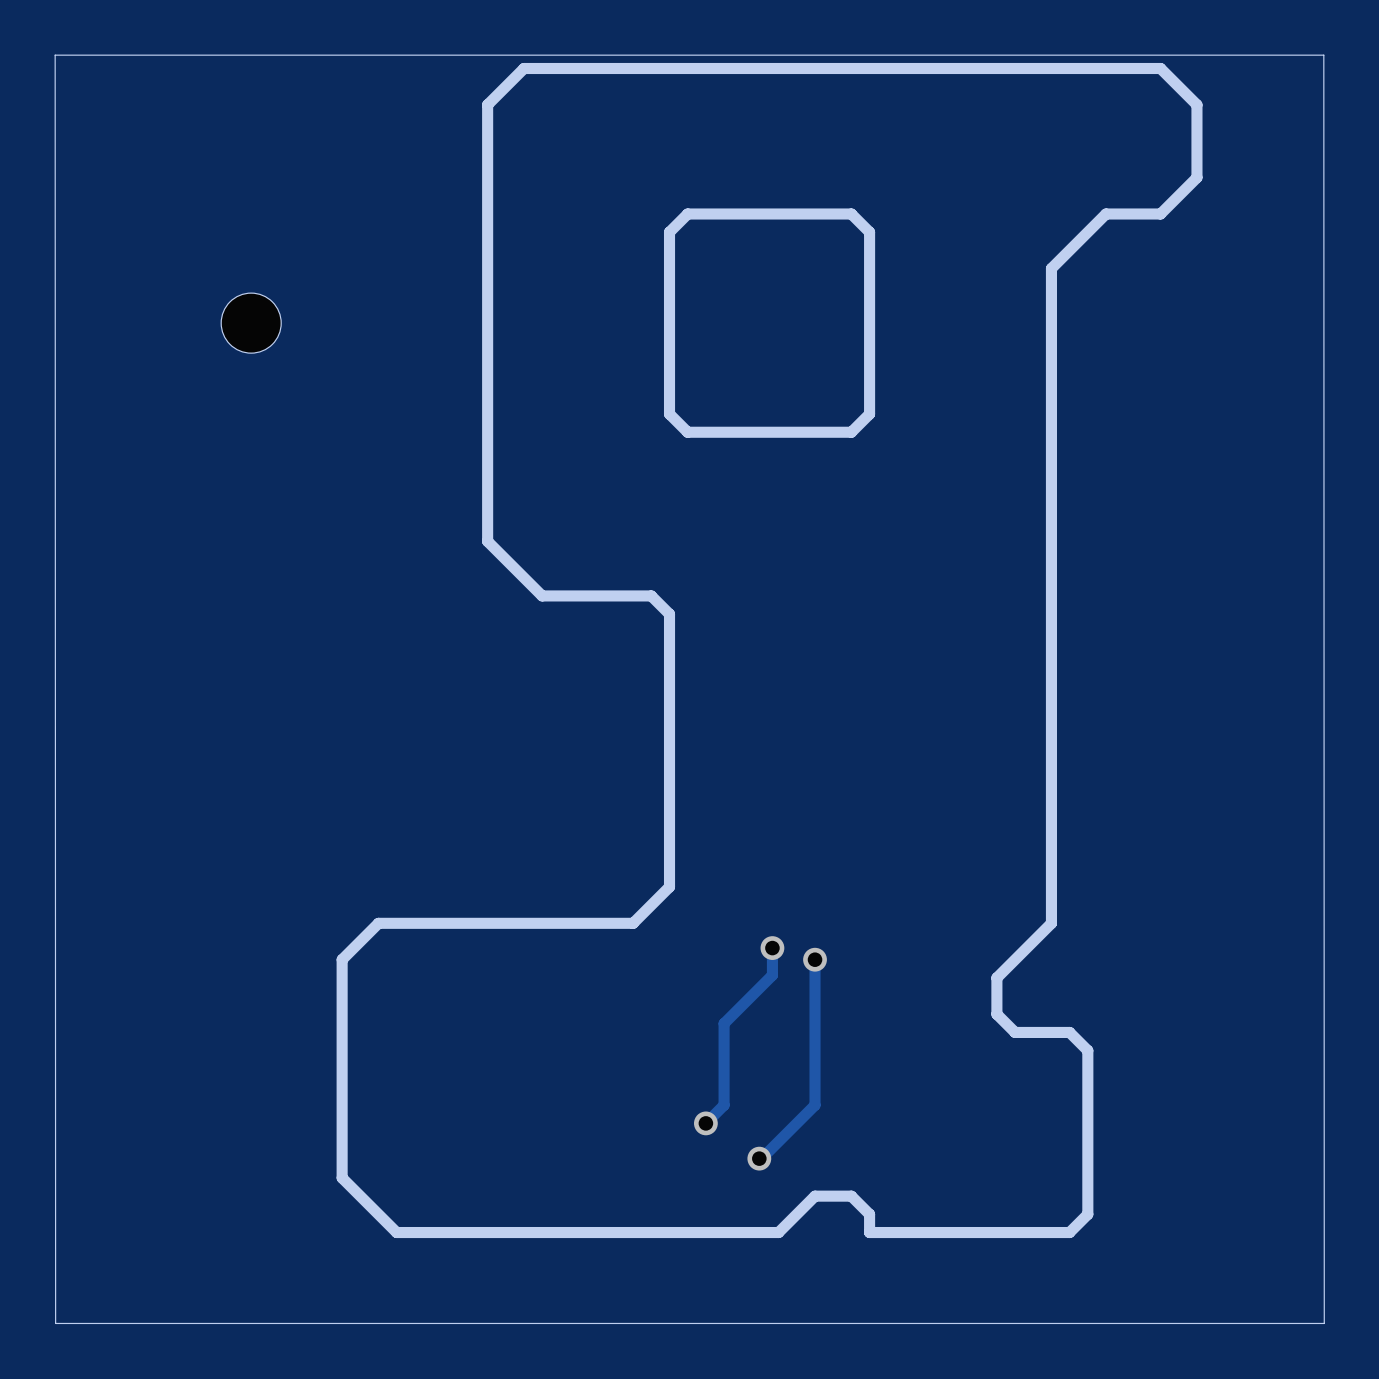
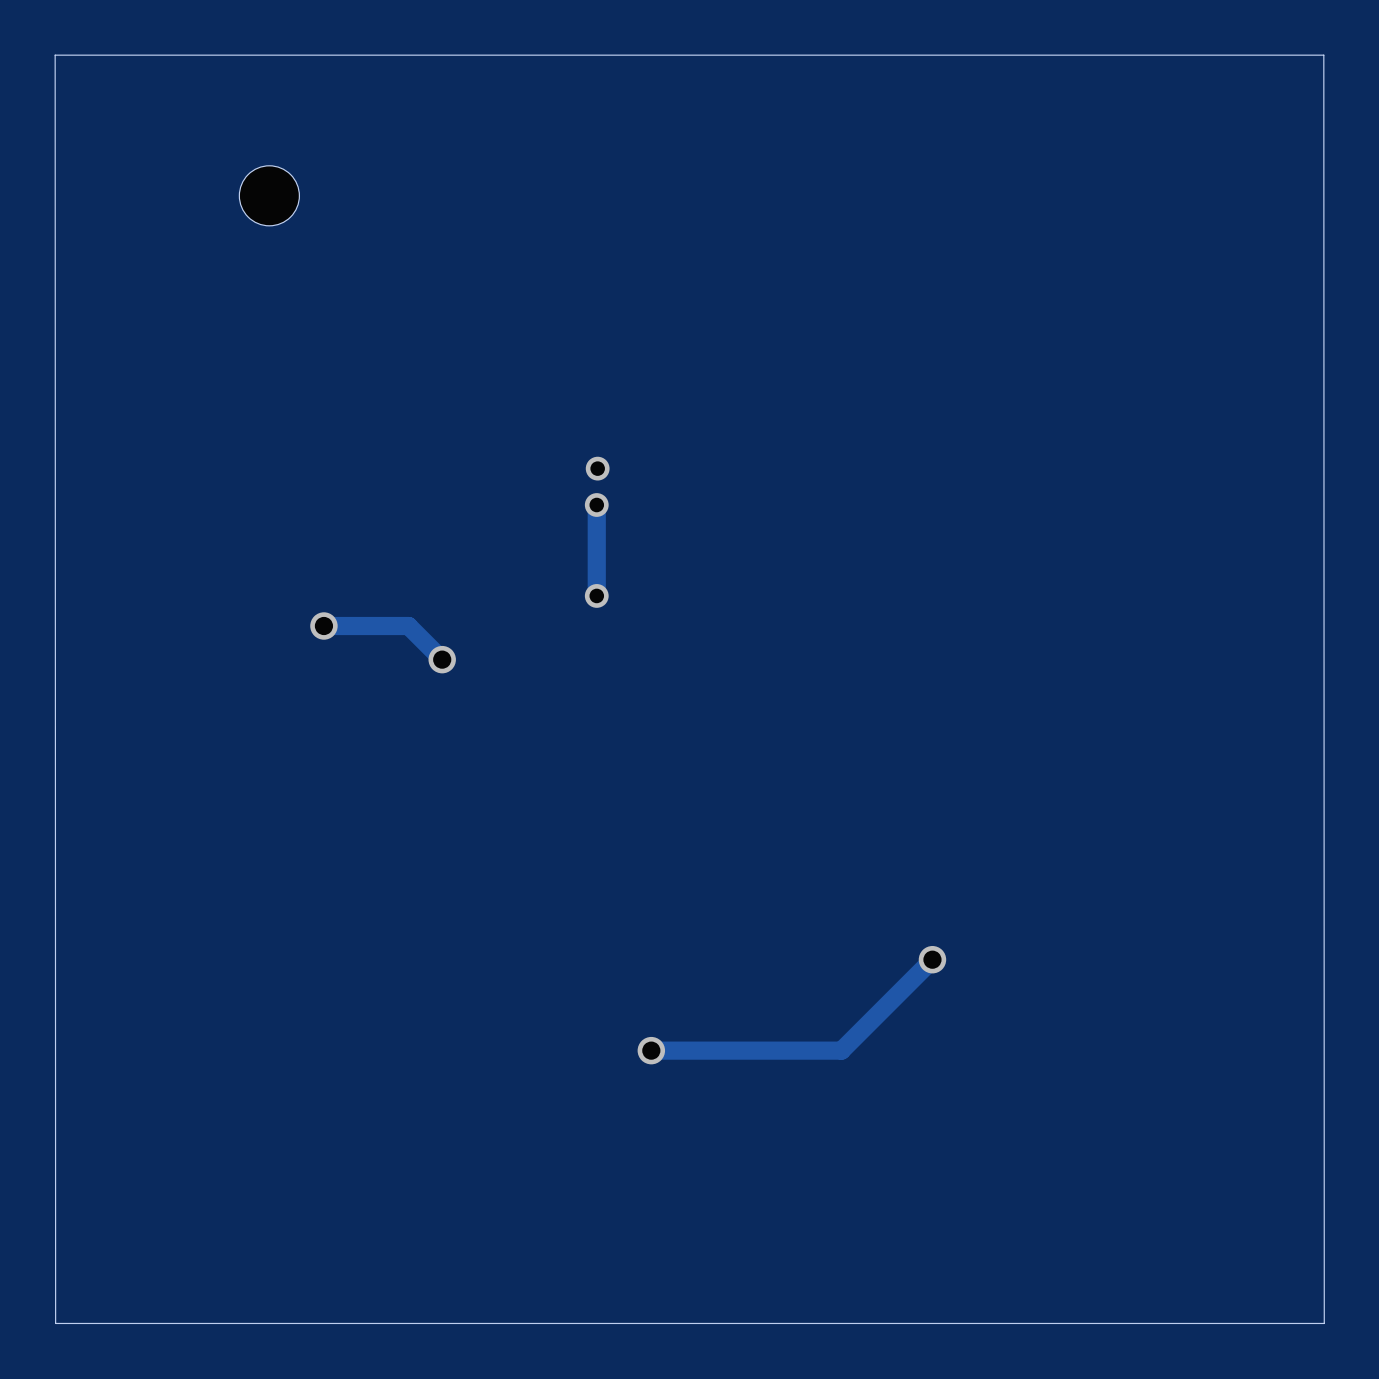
board edge: (1160, 68) (1196, 104) (1196, 177) (1160, 214) (1106, 214) (1051, 268) (1051, 923) (996, 977) (996, 1014) (1015, 1032) (1069, 1032) (1087, 1050) (1087, 1214) (1069, 1232) (869, 1232) (869, 1214) (851, 1196) (815, 1196) (778, 1232) (396, 1232) (342, 1177) (342, 959) (378, 923) (633, 923) (669, 886) (669, 614) (651, 595) (542, 595) (487, 541) (487, 104) (524, 68) (1160, 68) -> none
board edge: (851, 214) (687, 214) (669, 232) (669, 414) (687, 432) (851, 432) (869, 414) (869, 232) (851, 214) -> none
hole position: (251, 323) -> (269, 195)
via: none -> (597, 468)
track: none -> (596, 505) (596, 595)
via: none -> (596, 505)
via: none -> (596, 595)
track: none -> (323, 626) (408, 626) (442, 659)
via: none -> (323, 626)
via: none -> (442, 659)
track: (772, 948) (772, 975) (724, 1023) (724, 1105) (705, 1123) -> none
via: (772, 948) -> none
track: (815, 959) (815, 1105) (760, 1159) (759, 1158) -> none
via: (815, 959) -> none
track: none -> (932, 959) (841, 1050) (651, 1050)
via: none -> (932, 959)
via: none -> (651, 1050)
via: (705, 1123) -> none
via: (759, 1158) -> none

